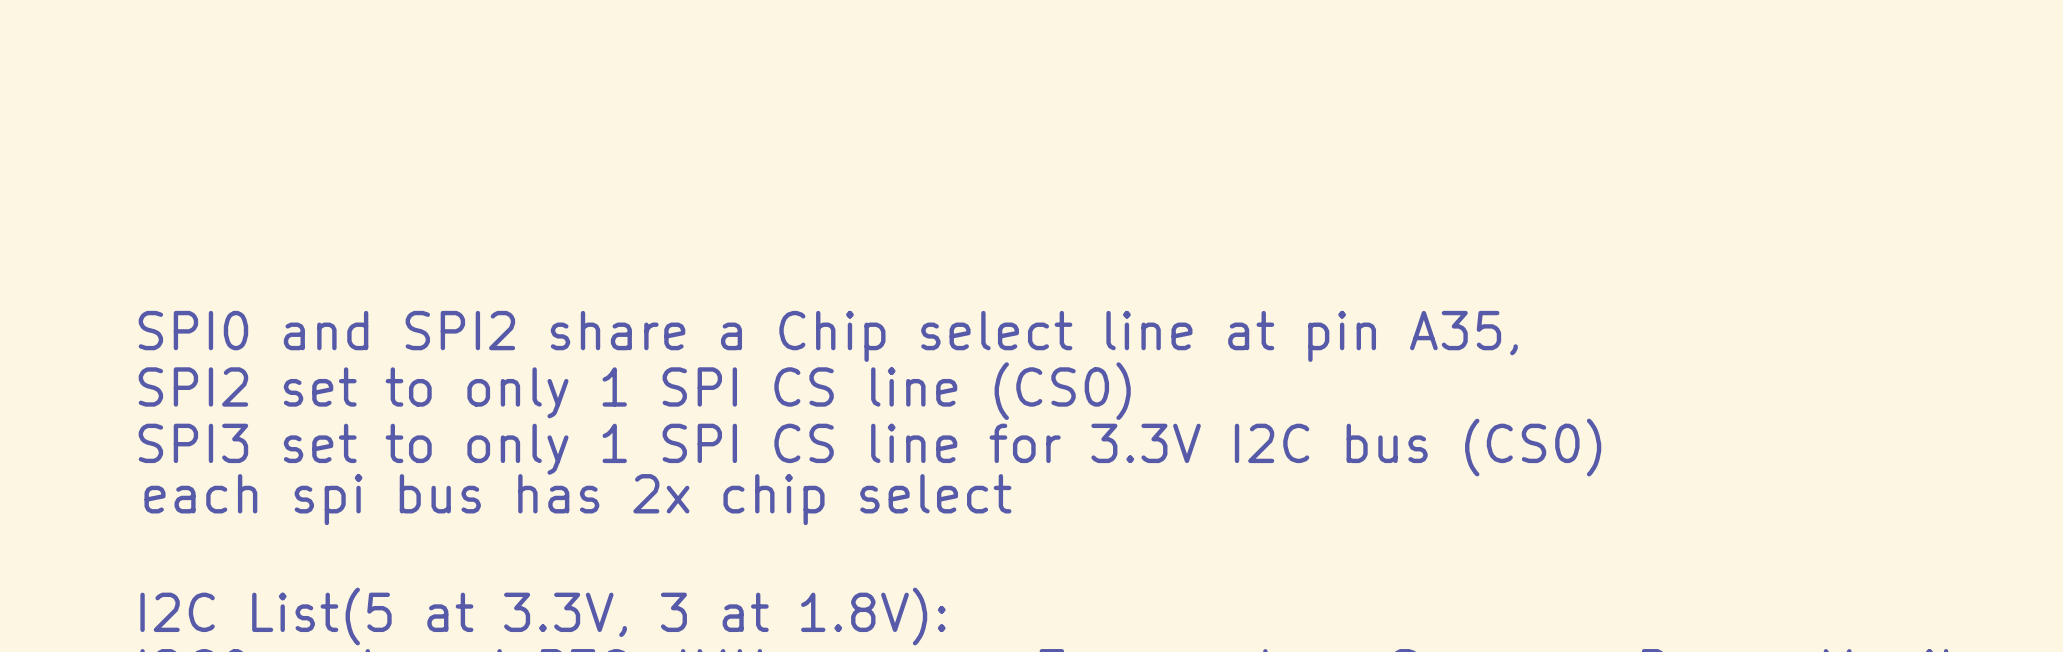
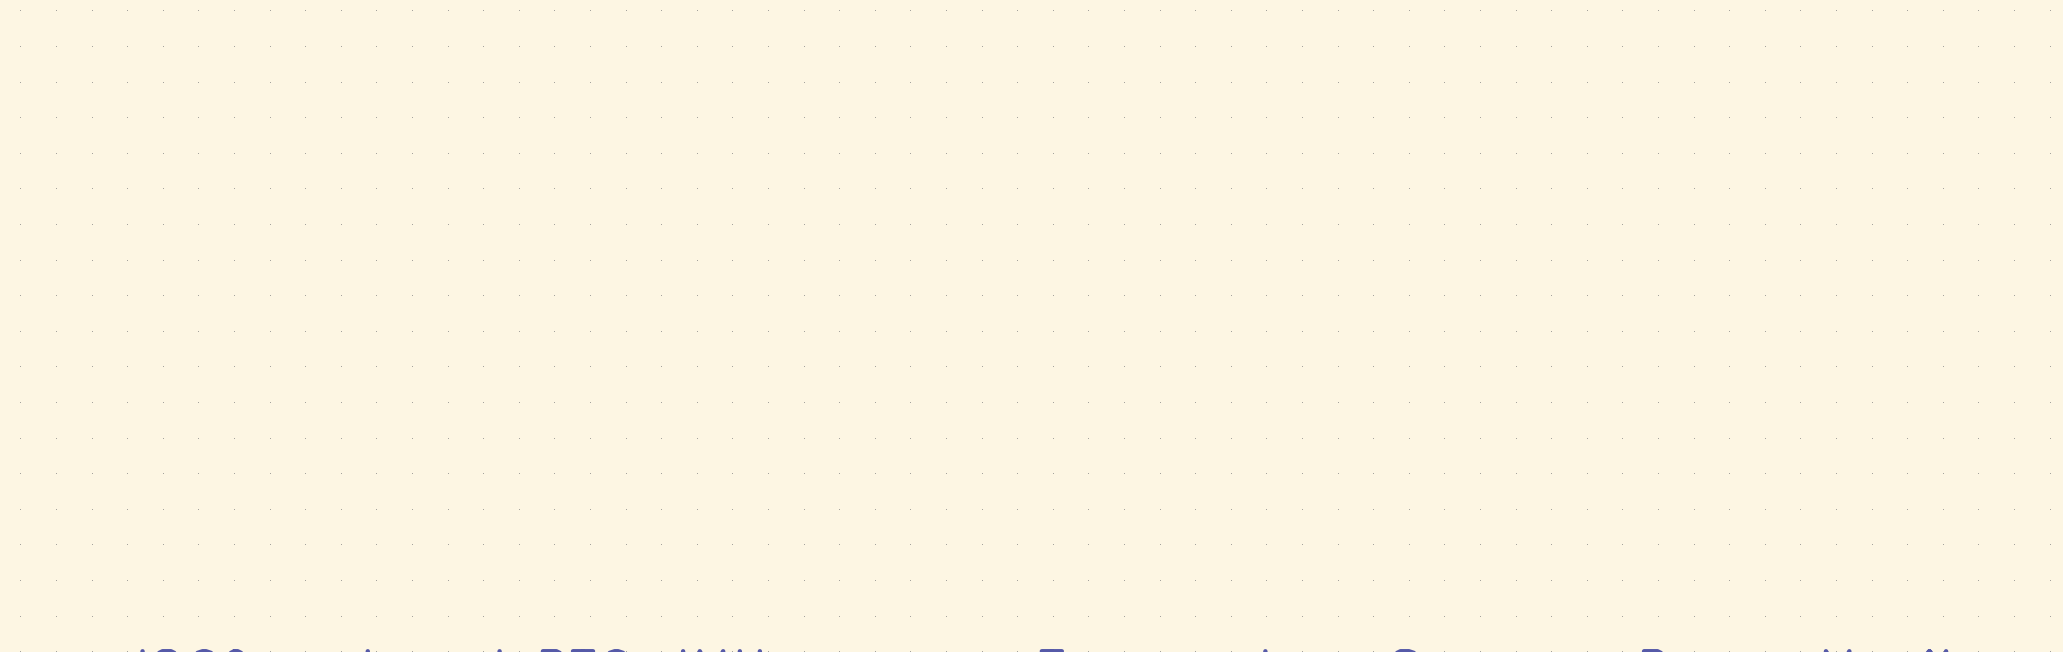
text: SPI0 and SPI2 share a Chip select line at pin A35, (828, 336) -> none
text: SPI2 set to only 1 SPI CS line (CS0) (634, 391) -> none
text: SPI3 set to only 1 SPI CS line for 3.3V I2C bus (CS0) (869, 447) -> none
text: each spi bus has 2x chip select (577, 499) -> none
text: I2C List(5 at 3.3V, 3 at 1.8V): (542, 616) -> none

